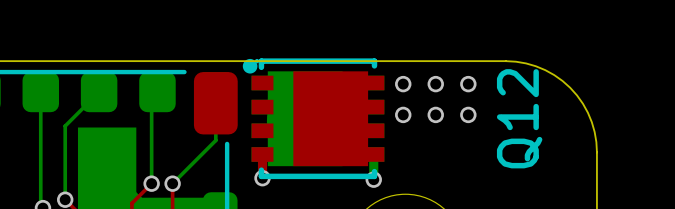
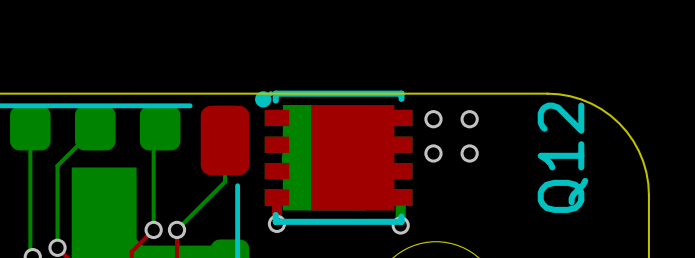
via: (468, 84) -> none
via: (468, 114) -> none

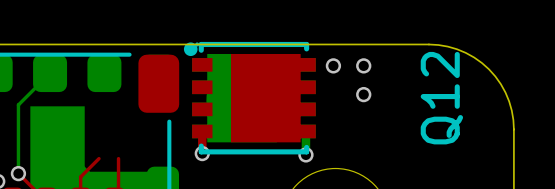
bottom track: (160, 128) (153, 134) (153, 229) -> none
bottom track: (225, 128) (225, 181) (176, 229) -> none
via: (433, 153) -> none
via: (153, 229) -> none
via: (176, 229) -> none

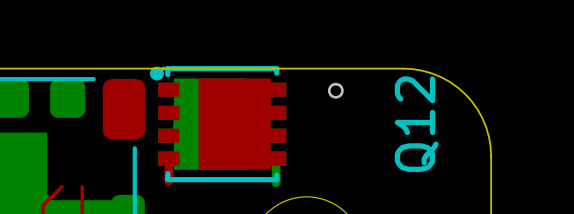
via: (333, 65) -> none
via: (363, 94) -> none
via: (202, 153) -> none
via: (305, 154) -> none

